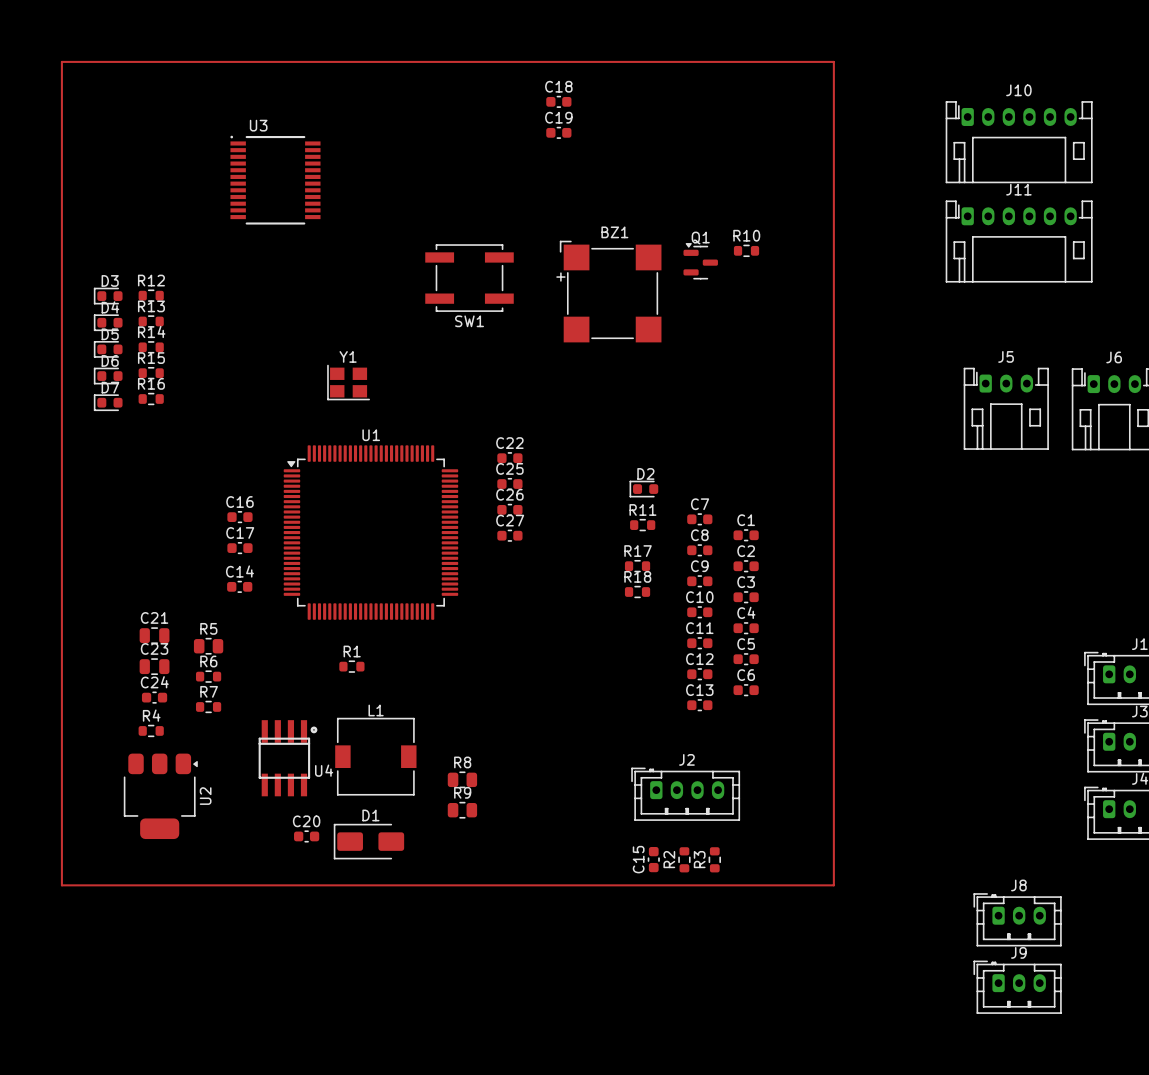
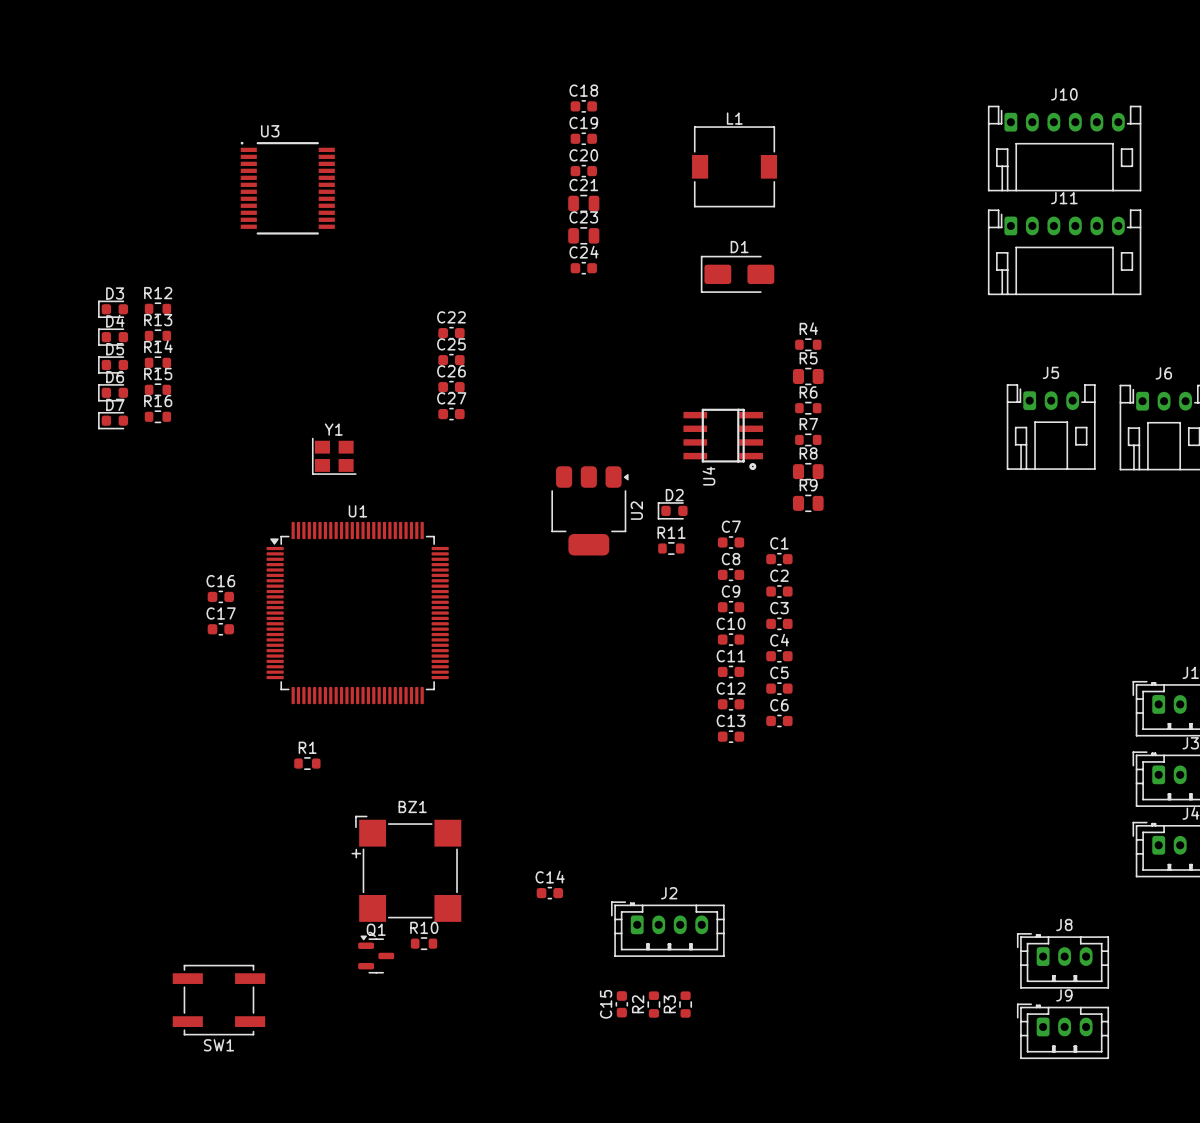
track: (61, 61) (833, 61) (833, 885) (61, 885) (61, 61) -> none
R10 position: (746, 250) -> (424, 943)
Q1 position: (700, 261) -> (376, 954)
SW1 position: (469, 278) -> (218, 1000)
BZ1 position: (610, 291) -> (408, 868)
Y1 position: (348, 382) -> (334, 456)
C22 position: (509, 458) -> (451, 333)
C25 position: (509, 484) -> (451, 360)
C26 position: (509, 509) -> (451, 387)
C16 position: (239, 517) -> (220, 596)
U1 position: (370, 532) -> (357, 613)
C27 position: (509, 535) -> (451, 414)
C17 position: (239, 548) -> (220, 629)
R17: (637, 566) -> none
C14 position: (239, 586) -> (549, 893)
R18: (637, 591) -> none
C21 position: (154, 635) -> (583, 203)
R5 position: (208, 646) -> (808, 376)
C23 position: (154, 666) -> (583, 235)
R1 position: (351, 666) -> (307, 763)
R6 position: (208, 676) -> (808, 408)
C24 position: (154, 697) -> (583, 268)
R7 position: (208, 706) -> (808, 439)
R4 position: (151, 730) -> (808, 344)
L1 position: (375, 756) -> (734, 166)
U4 rotation: 0° (288, 758) -> 90° clockwise (723, 439)
U4 position: (288, 758) -> (723, 439)
R8 position: (462, 779) -> (808, 471)
J2 position: (685, 794) -> (667, 929)
U2 position: (160, 796) -> (590, 510)
R9 position: (462, 810) -> (808, 503)
C20 position: (306, 836) -> (583, 171)
D1 position: (369, 841) -> (737, 274)
C15 position: (653, 859) -> (621, 1004)
R2 position: (684, 859) -> (653, 1004)
R3 position: (714, 859) -> (685, 1004)

